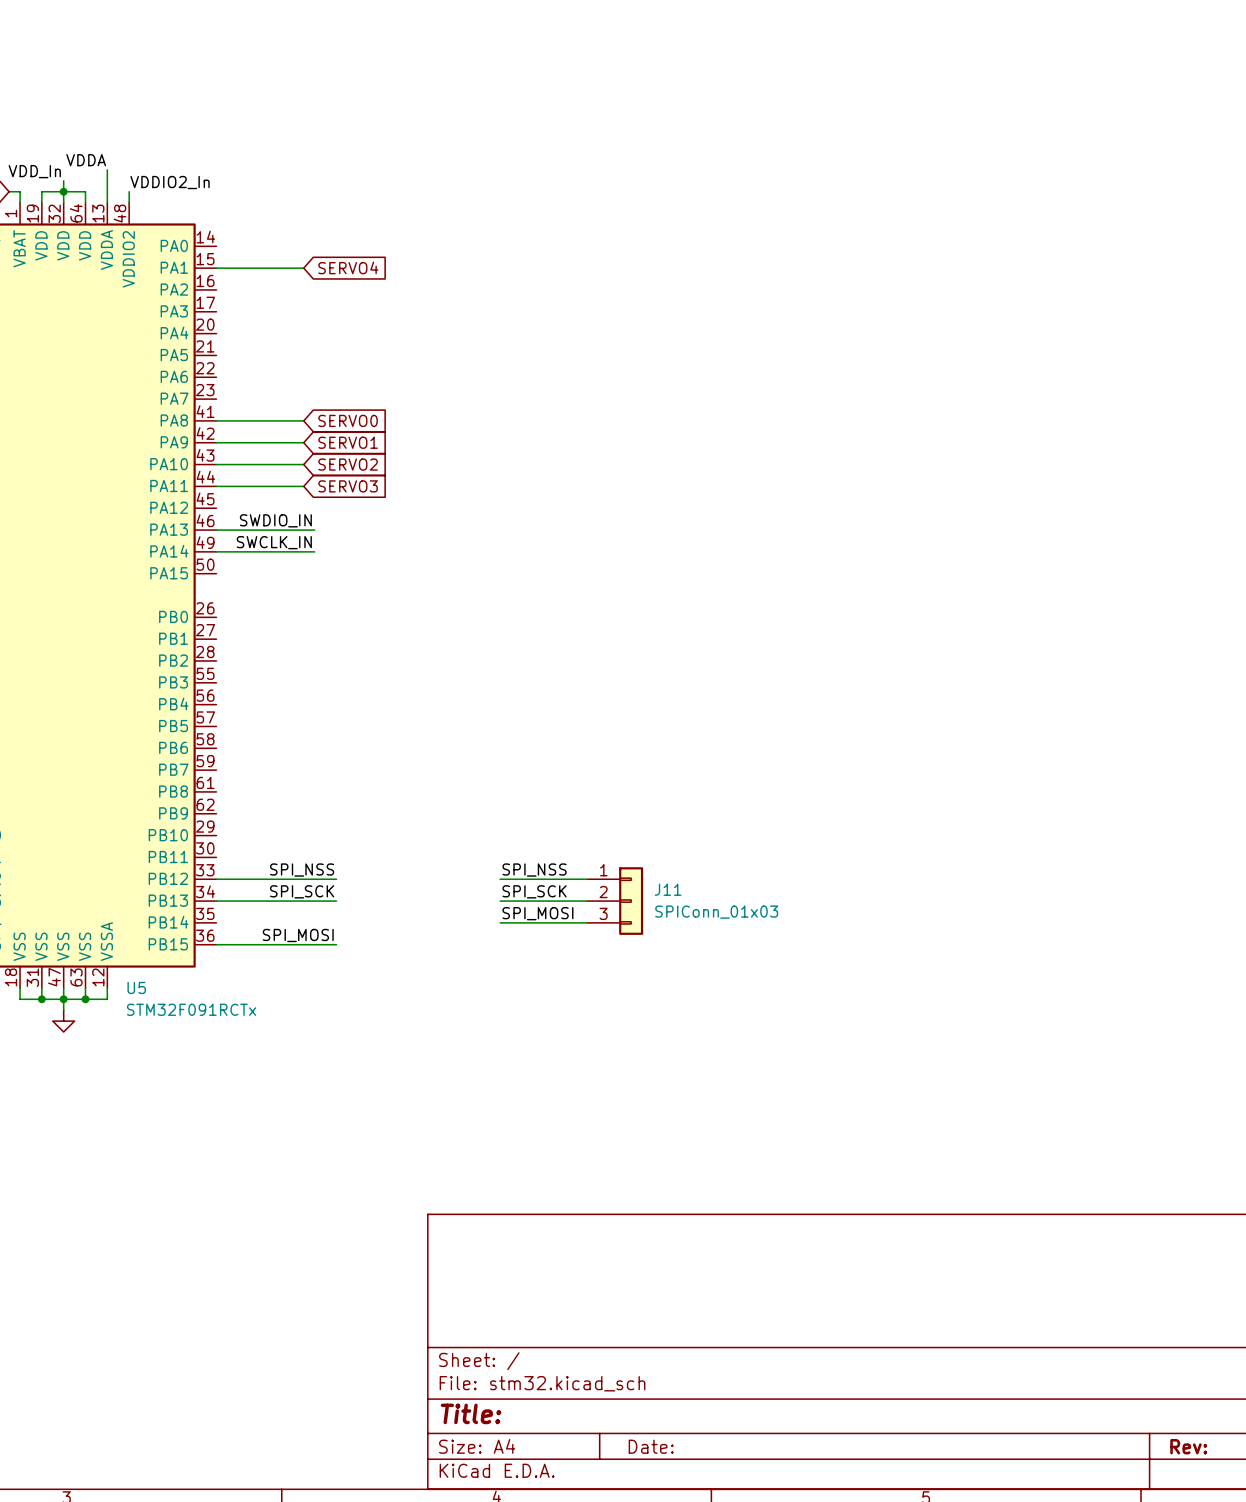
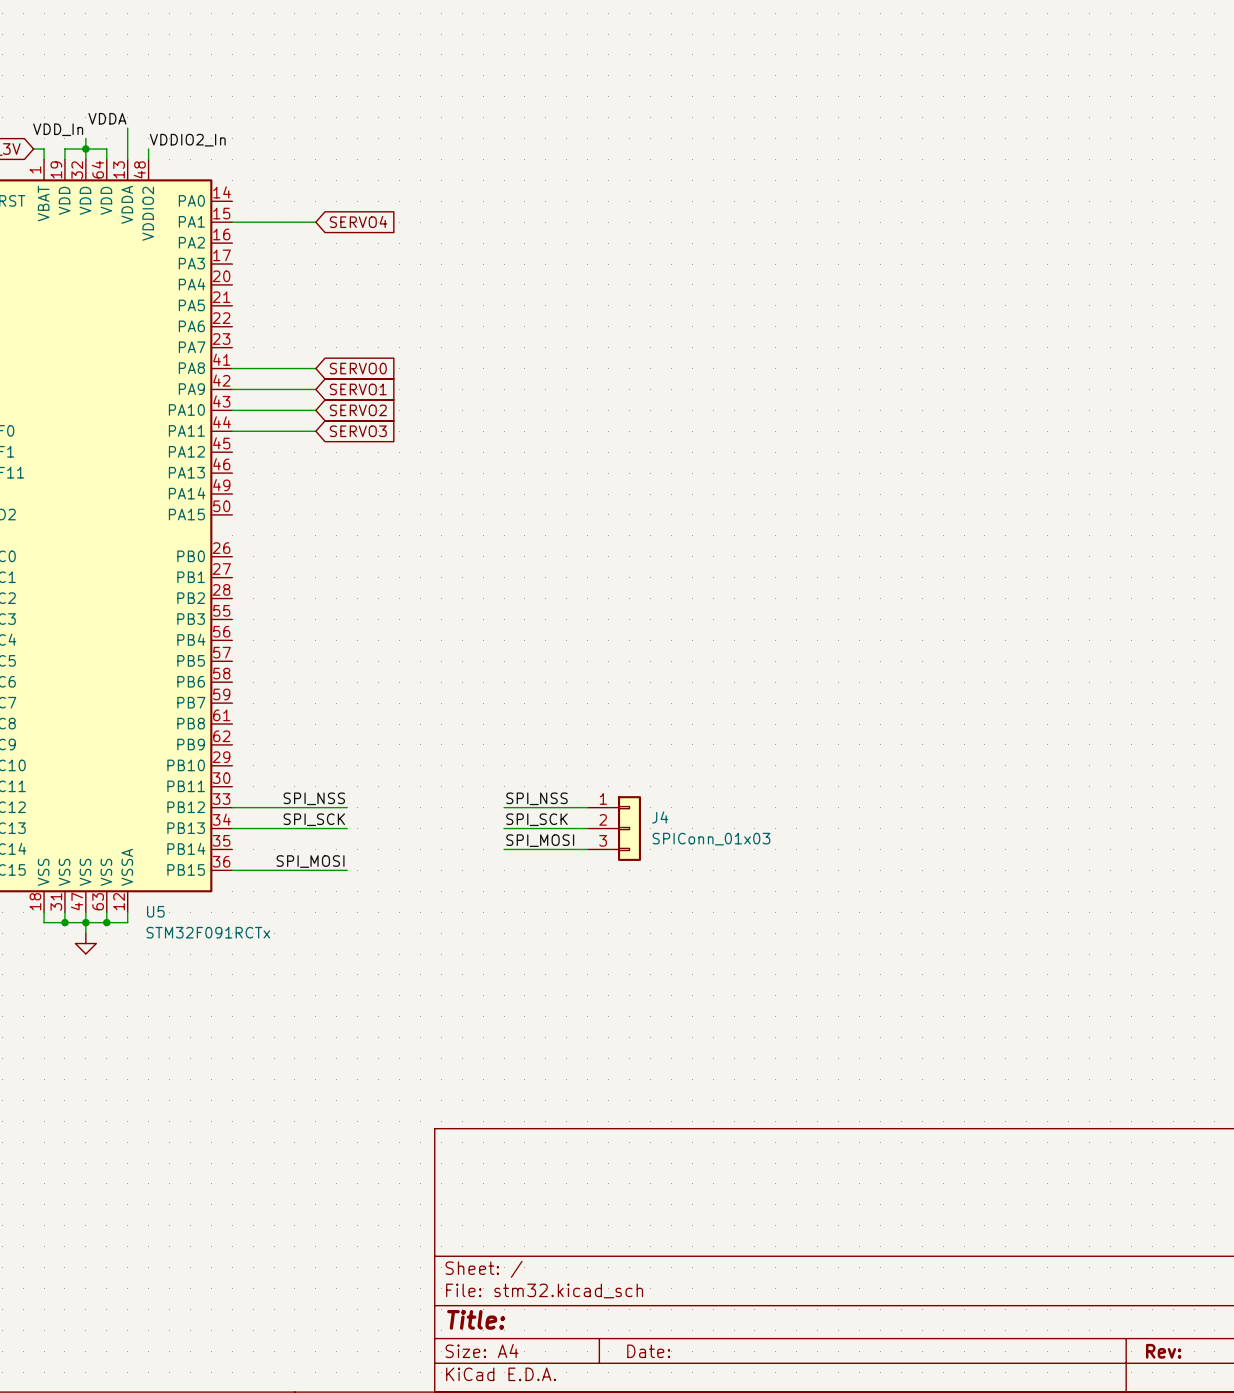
label: SWDIO_IN (275, 520) -> none
wire: (216, 530) (314, 530) -> none
label: SWCLK_IN (274, 542) -> none
wire: (216, 551) (314, 551) -> none
J11 name: J11 (668, 889) -> J4 (660, 817)

